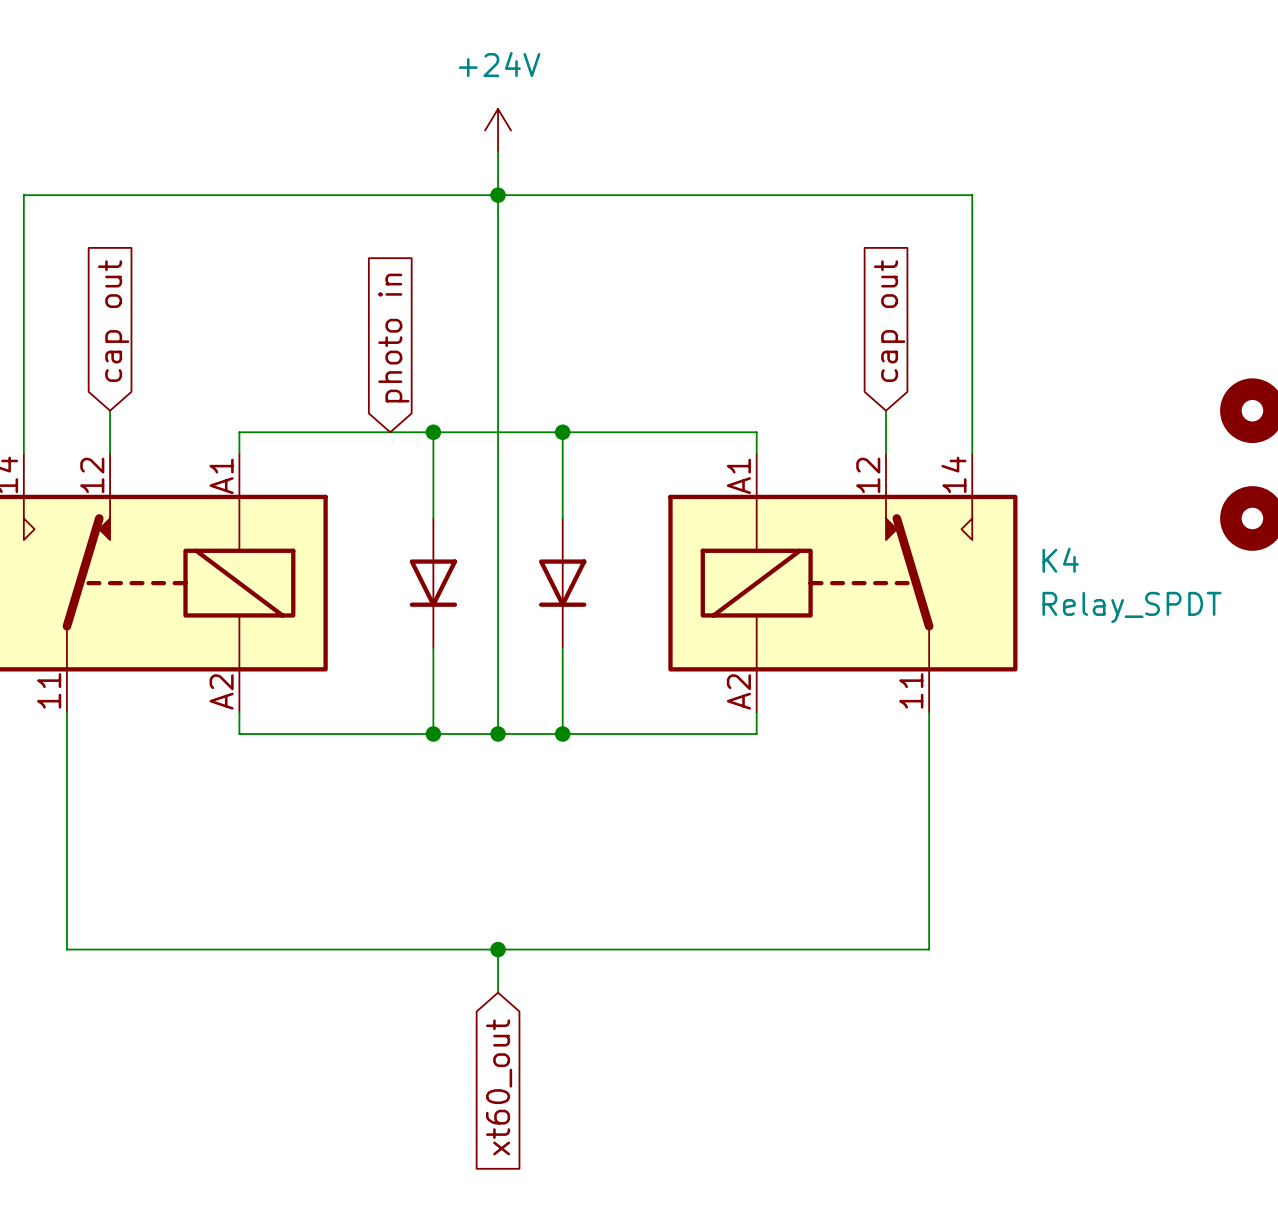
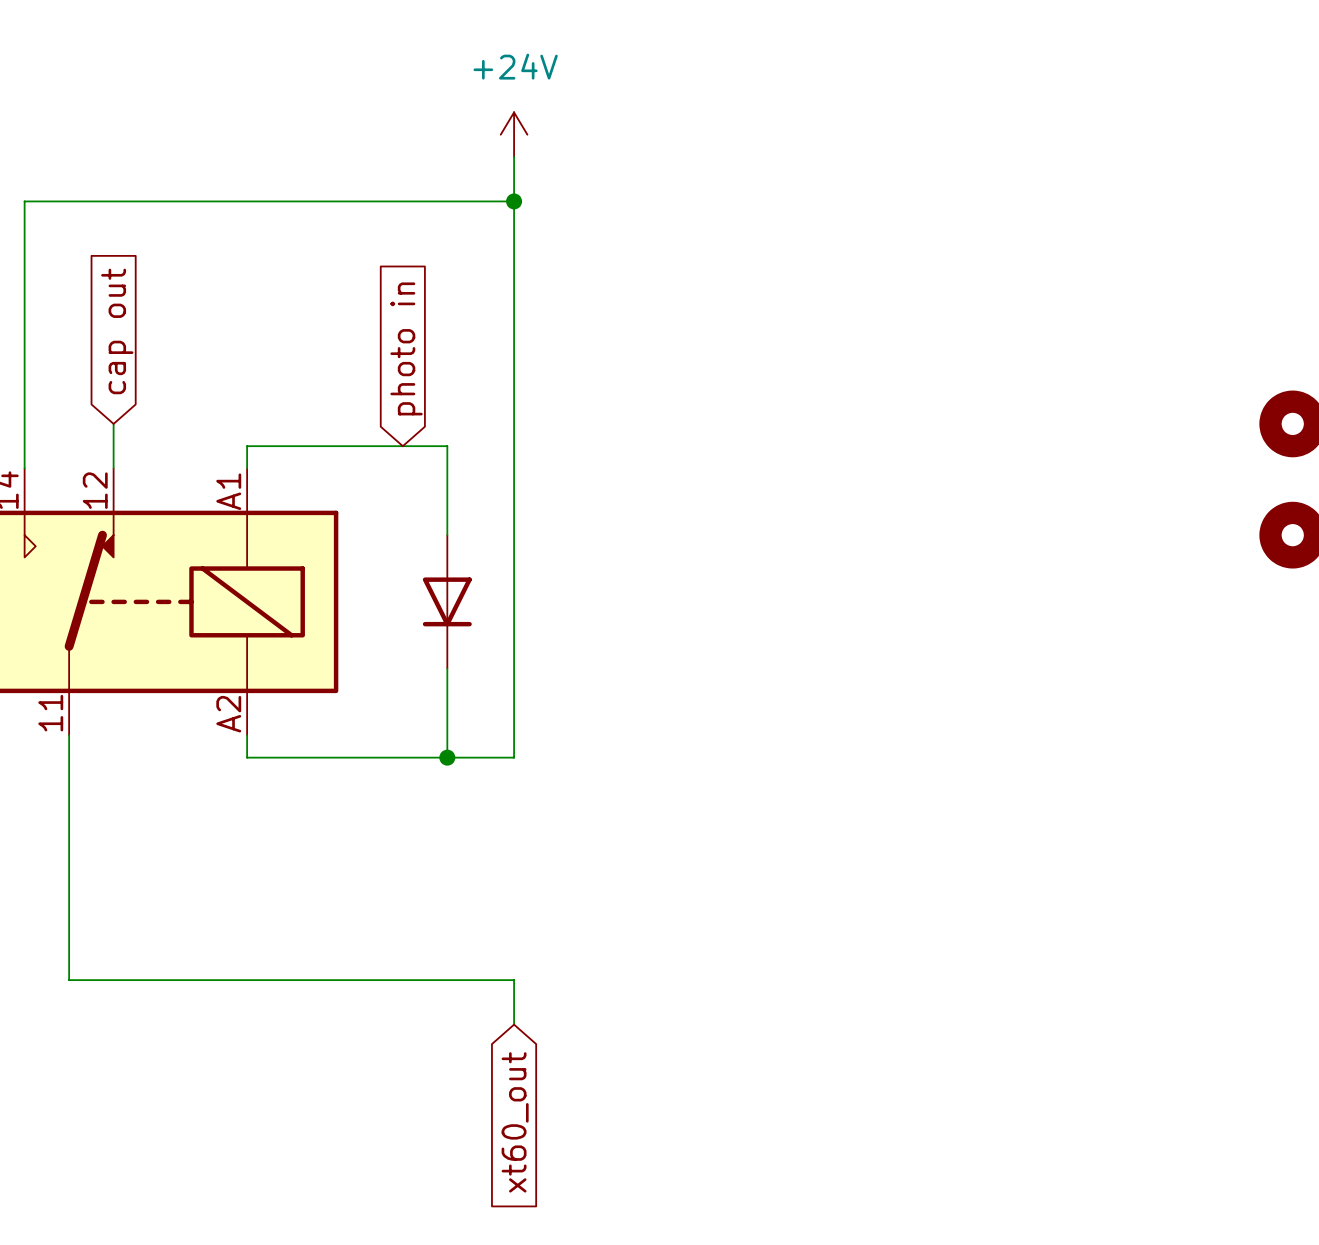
wire: (498, 195) (972, 195) (972, 453) -> none
global label: cap out (889, 321) -> none
wire: (886, 410) (886, 453) -> none
wire: (433, 432) (756, 432) (756, 453) -> none
junction: (433, 432) -> none
wire: (562, 432) (562, 518) -> none
junction: (562, 432) -> none
part: (562, 583) -> none
K4: Relay_SPDT (842, 583) -> none
wire: (562, 647) (562, 734) -> none
wire: (756, 712) (756, 734) (498, 734) -> none
wire: (929, 712) (929, 949) (498, 949) -> none
junction: (498, 734) -> none
junction: (562, 734) -> none
junction: (498, 949) -> none

